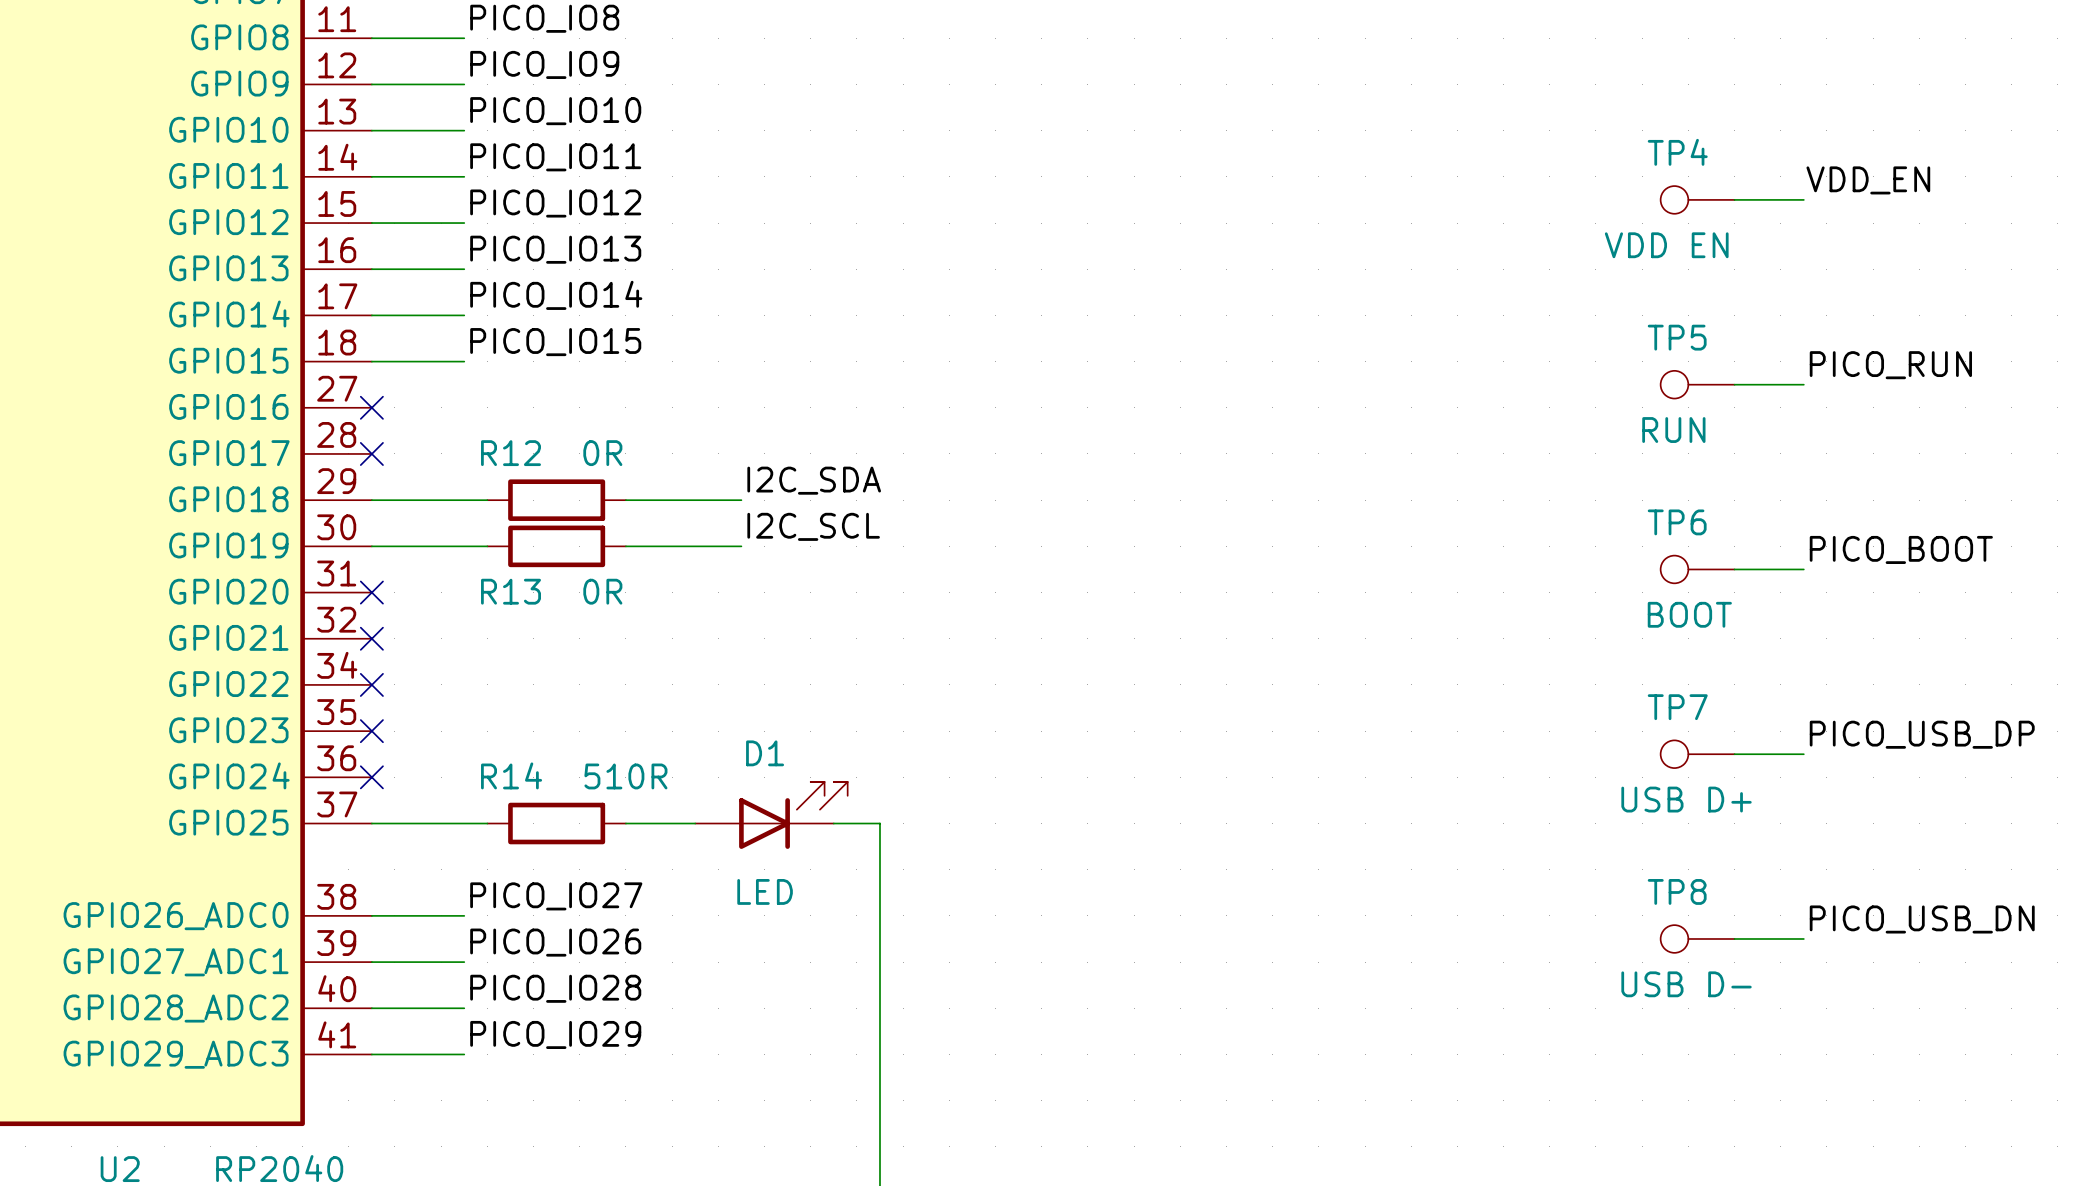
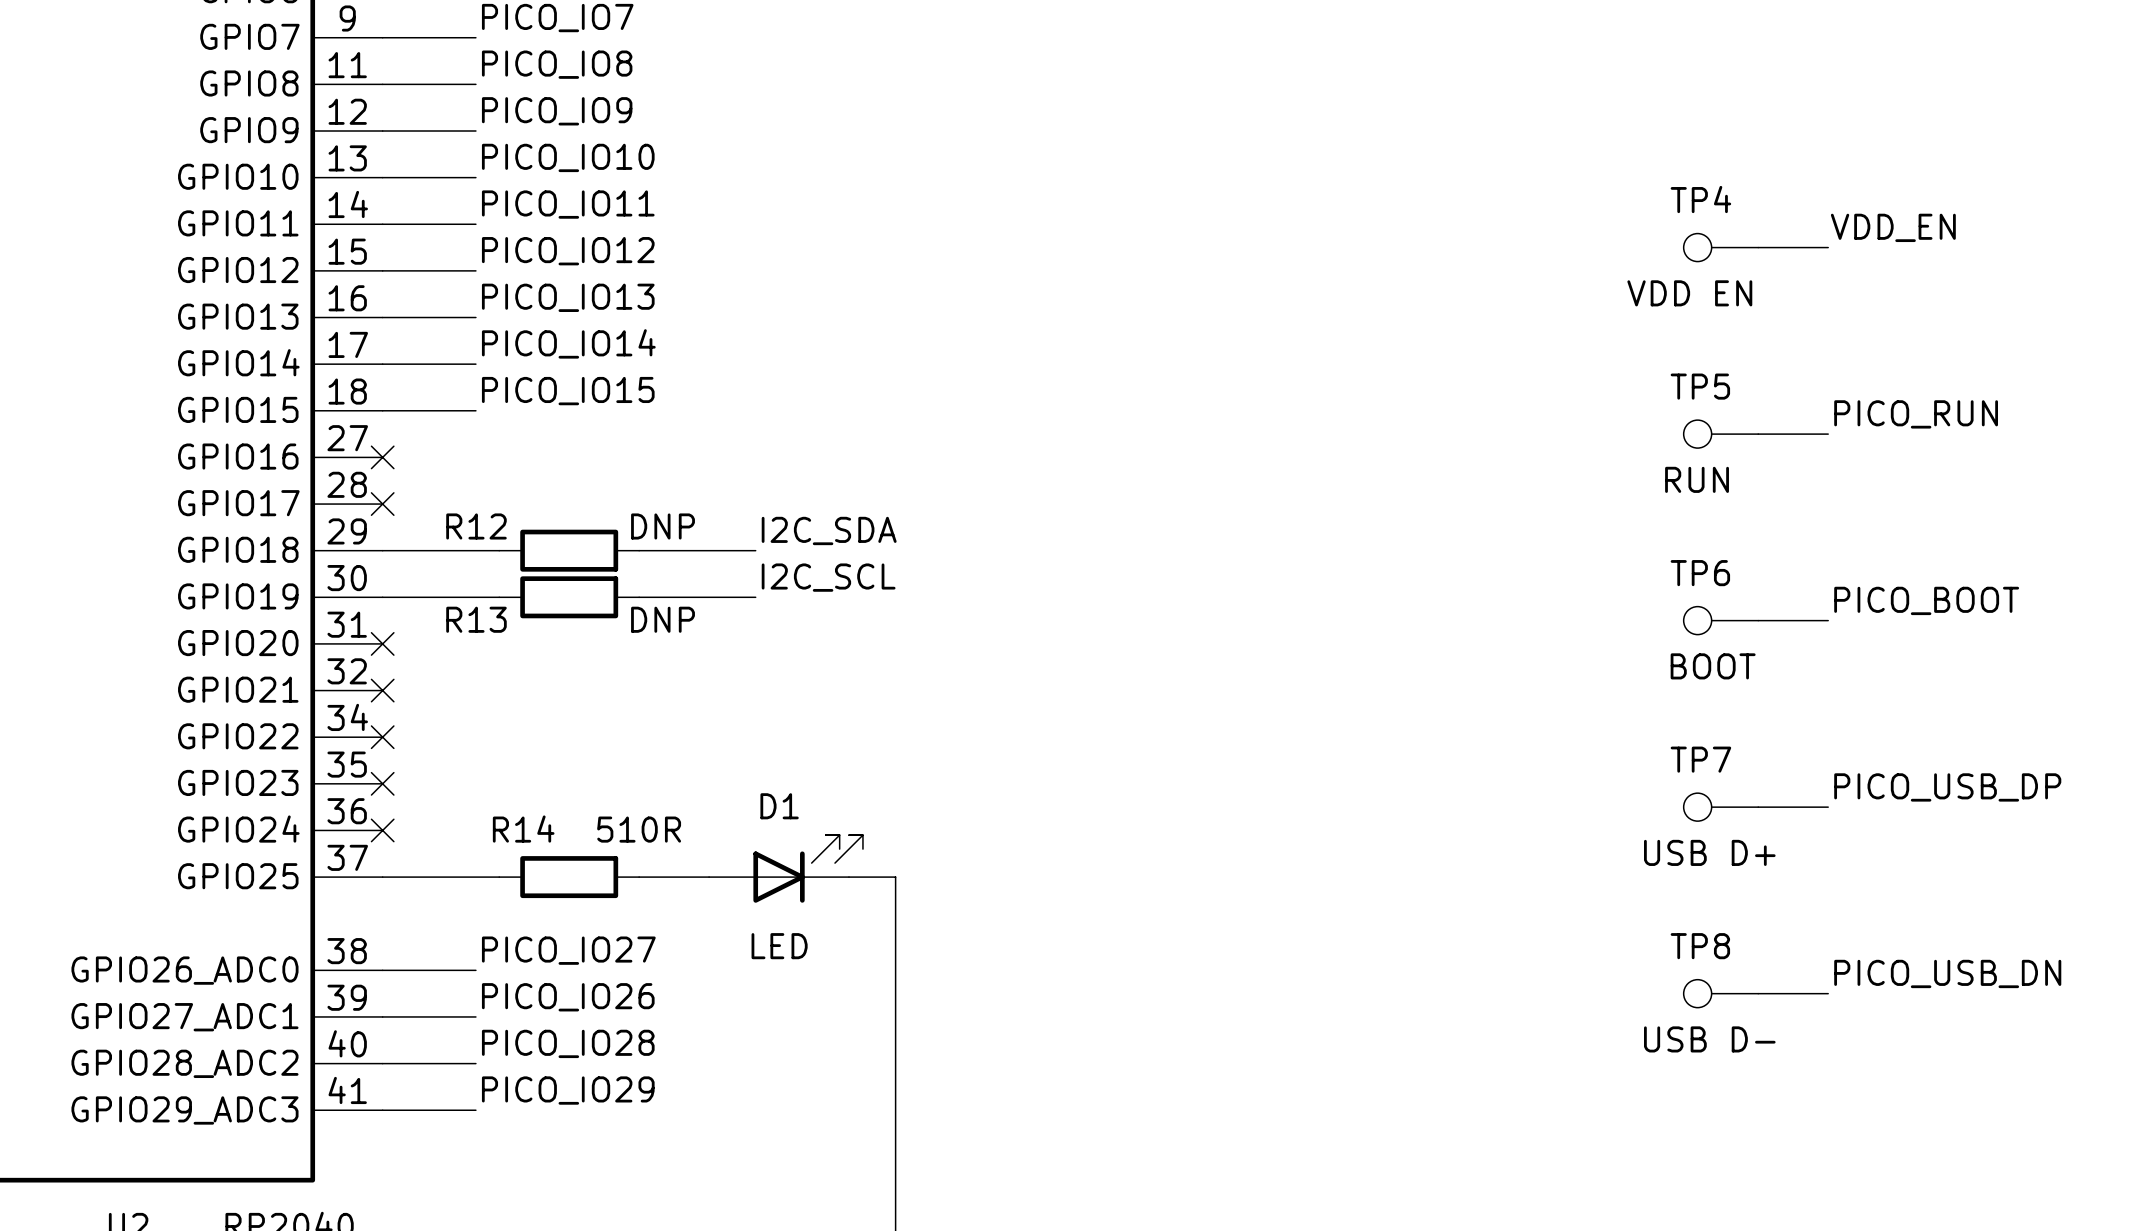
R12 name position: R12 (511, 453) -> R12 (476, 526)
R12 value: 0R (602, 453) -> DNP (663, 526)
R13 name position: R13 (511, 591) -> R13 (476, 619)
R13 value: 0R (602, 591) -> DNP (663, 619)

